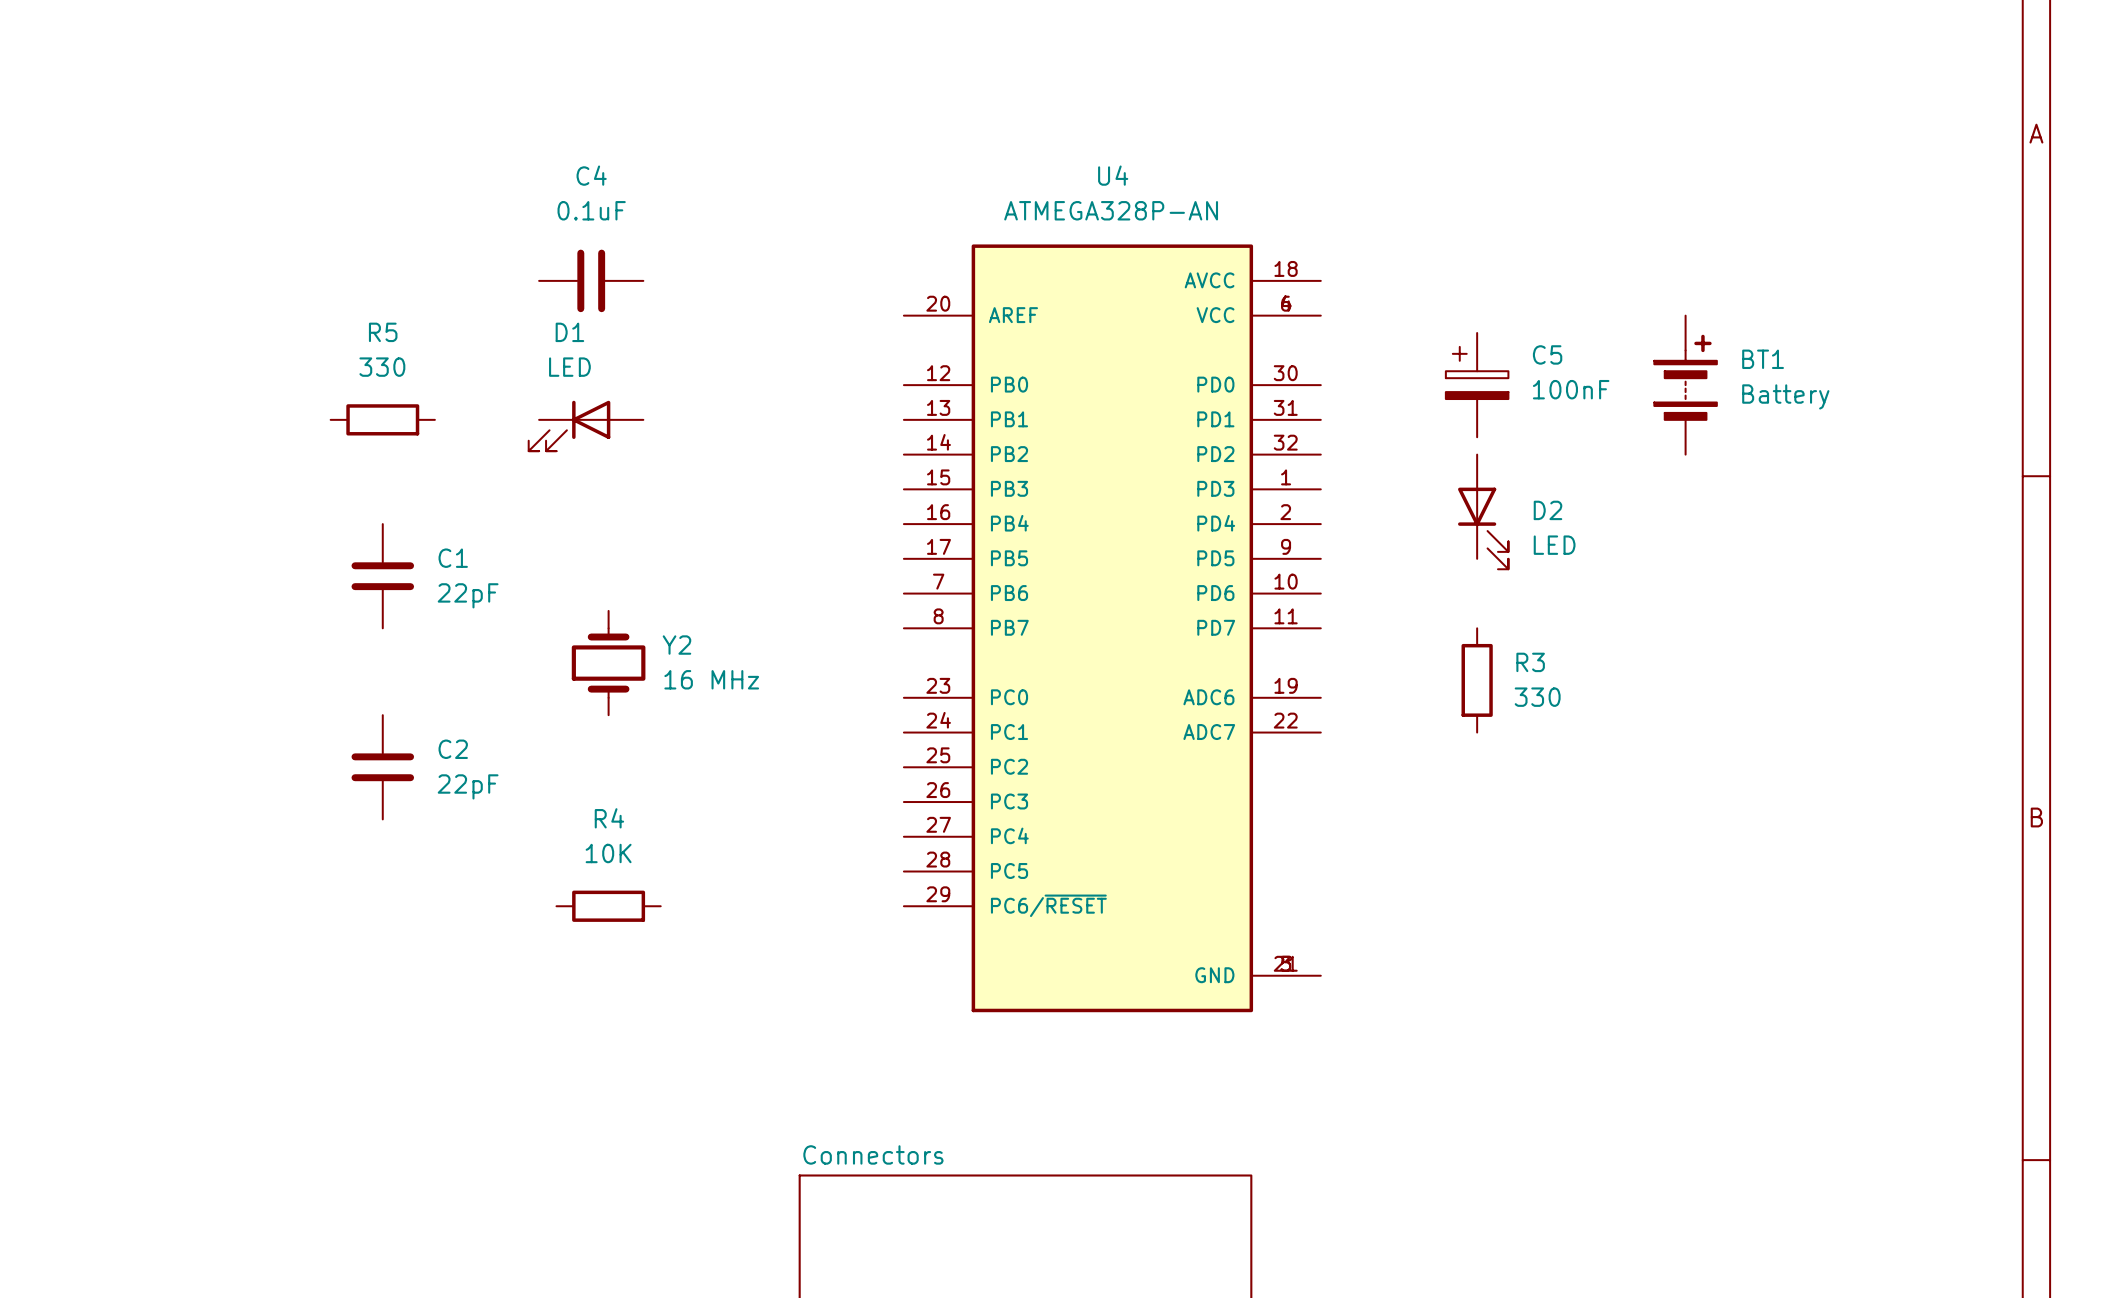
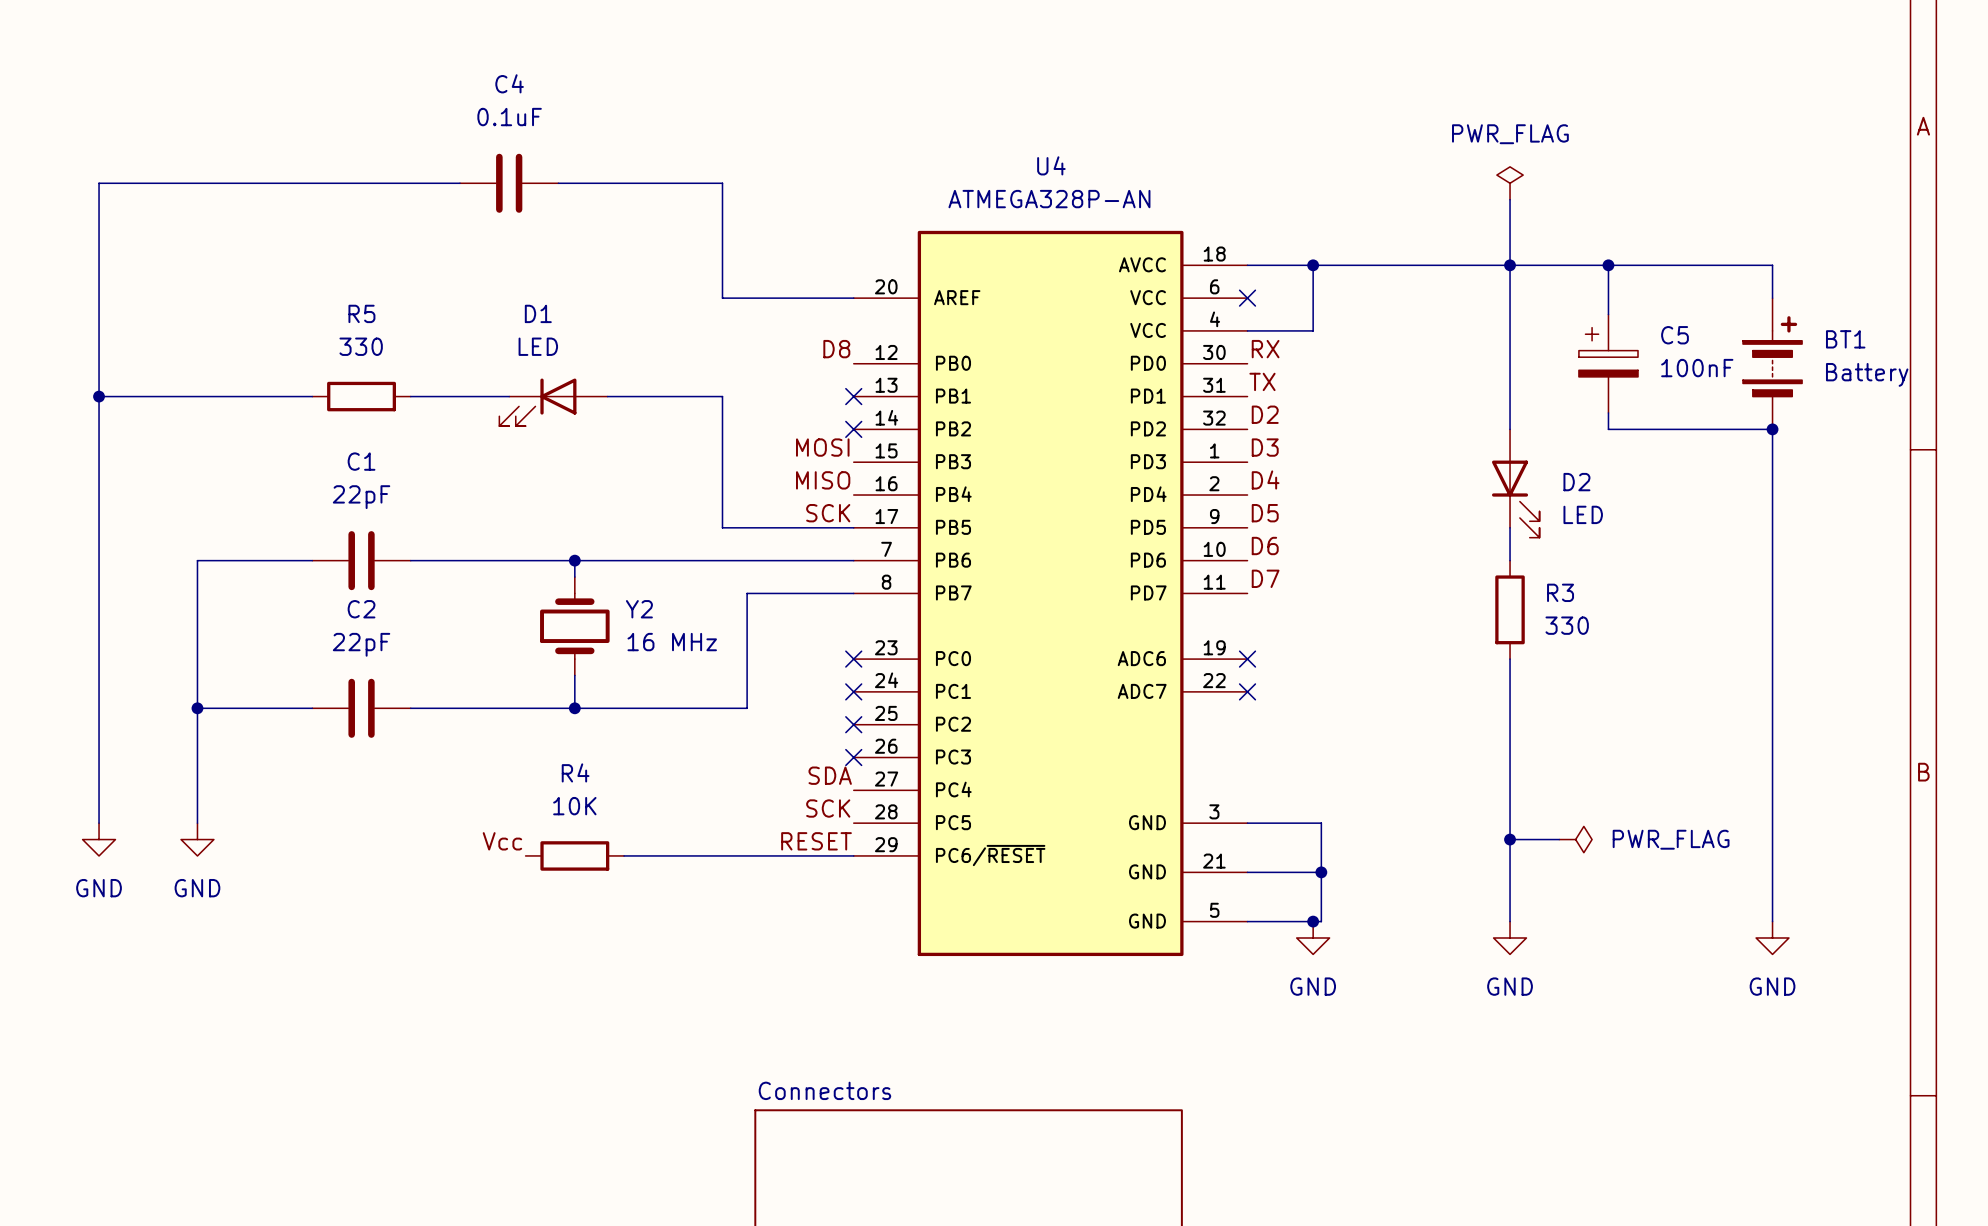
wire: none -> (459, 183) (99, 183) (99, 823)
wire: none -> (558, 183) (722, 183) (722, 298) (853, 298)
power symbol: none -> PWR_FLAG (1510, 183)
wire: none -> (1510, 199) (1510, 429)
U4 symbol: [903, 244, 1321, 1013] -> [853, 230, 1248, 957]
C4 position: (591, 280) -> (509, 183)
wire: none -> (1247, 265) (1772, 265) (1772, 298)
wire: none -> (1313, 265) (1313, 330) (1247, 330)
junction: none -> (1313, 265)
junction: none -> (1510, 265)
wire: none -> (1608, 265) (1608, 314)
junction: none -> (1608, 265)
no-connect mark: none -> (1247, 298)
label: none -> D8 (836, 349)
label: none -> RX (1265, 349)
C5 position: (1477, 385) -> (1608, 363)
BT1 position: (1685, 385) -> (1772, 363)
label: none -> TX (1262, 381)
wire: none -> (99, 396) (312, 396)
junction: none -> (99, 396)
wire: none -> (410, 396) (509, 396)
wire: none -> (607, 396) (722, 396) (722, 527) (853, 527)
no-connect mark: none -> (853, 396)
wire: none -> (1608, 412) (1608, 429) (1772, 429) (1772, 921)
label: none -> D2 (1265, 414)
no-connect mark: none -> (853, 429)
junction: none -> (1772, 429)
label: none -> MOSI (822, 447)
label: none -> D3 (1265, 447)
label: none -> MISO (823, 480)
label: none -> D4 (1265, 479)
D2 position: (1483, 511) -> (1515, 483)
label: none -> SCK (828, 513)
label: none -> D5 (1265, 513)
C1 name position: C1 (453, 558) -> C1 (361, 461)
wire: none -> (1510, 527) (1510, 560)
C1 rotation: 0° (382, 576) -> 90° clockwise (361, 560)
label: none -> D6 (1265, 545)
wire: none -> (312, 560) (197, 560) (197, 823)
wire: none -> (410, 560) (853, 560)
wire: none -> (574, 560) (574, 577)
junction: none -> (574, 560)
C1 value position: 22pF (468, 595) -> 22pF (361, 497)
label: none -> D7 (1265, 578)
wire: none -> (853, 593) (747, 593) (747, 708) (410, 708)
R3 position: (1477, 680) -> (1510, 609)
no-connect mark: none -> (853, 659)
no-connect mark: none -> (1247, 659)
wire: none -> (1510, 659) (1510, 921)
wire: none -> (574, 675) (574, 708)
no-connect mark: none -> (853, 691)
no-connect mark: none -> (1247, 691)
wire: none -> (197, 708) (312, 708)
junction: none -> (197, 708)
C2 name position: C2 (453, 749) -> C2 (361, 609)
junction: none -> (574, 708)
C2 rotation: 0° (382, 767) -> 90° clockwise (361, 708)
no-connect mark: none -> (853, 724)
C2 value position: 22pF (468, 786) -> 22pF (361, 644)
no-connect mark: none -> (853, 757)
label: none -> SDA (830, 775)
label: none -> SCK (828, 808)
wire: none -> (1247, 823) (1321, 823) (1321, 921) (1247, 921)
power symbol: none -> GND (99, 839)
power symbol: none -> GND (197, 839)
wire: none -> (1510, 839) (1559, 839)
junction: none -> (1510, 839)
power symbol: none -> PWR_FLAG (1575, 839)
label: none -> Vcc (502, 841)
label: none -> RESET (816, 841)
wire: none -> (624, 855) (853, 855)
wire: none -> (1247, 872) (1321, 872)
junction: none -> (1321, 872)
junction: none -> (1313, 921)
power symbol: none -> GND (1313, 938)
power symbol: none -> GND (1510, 938)
power symbol: none -> GND (1772, 938)

